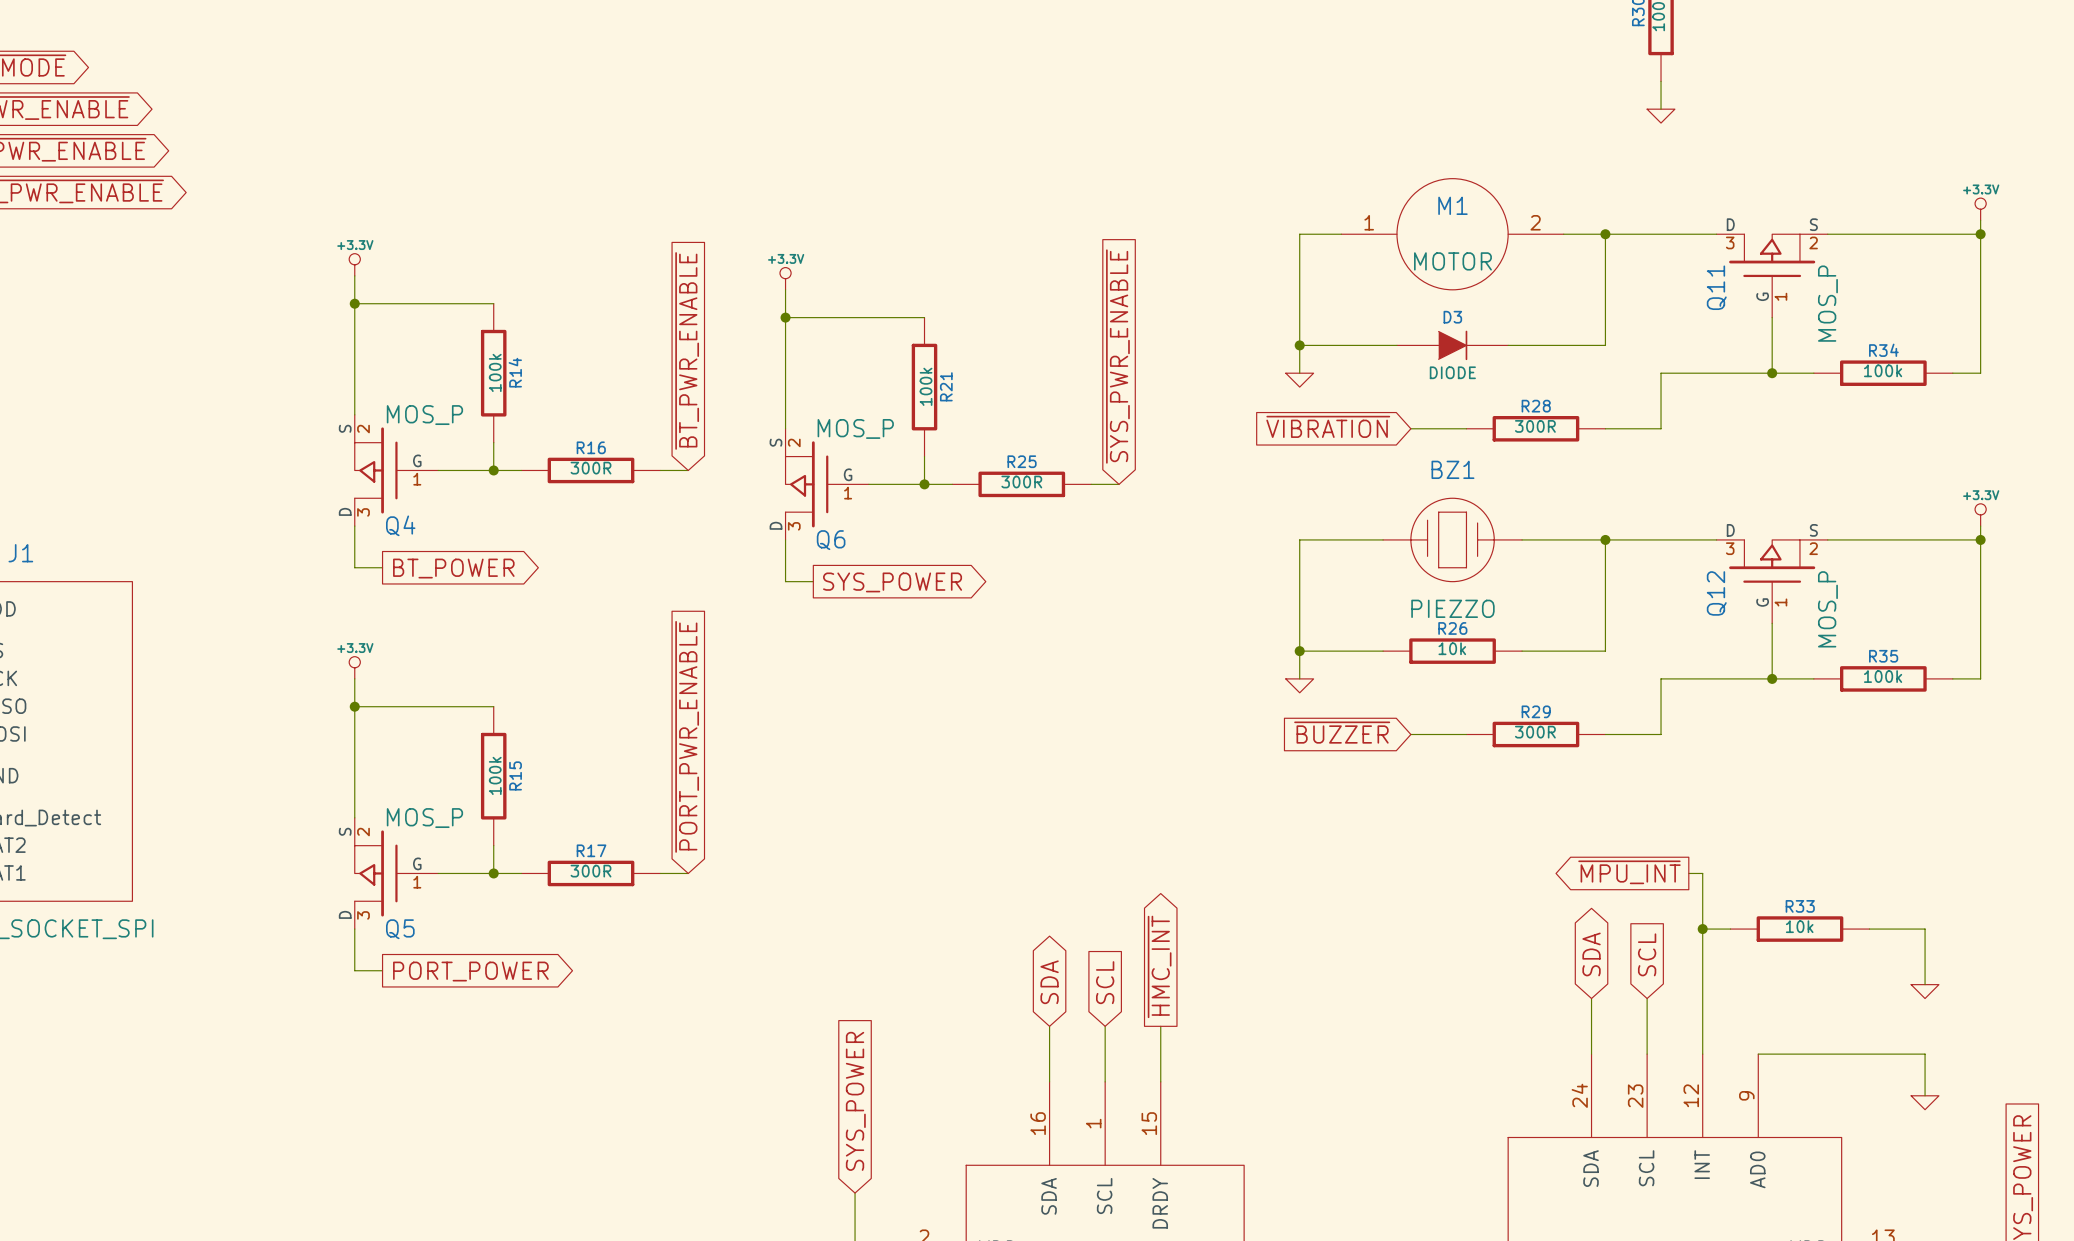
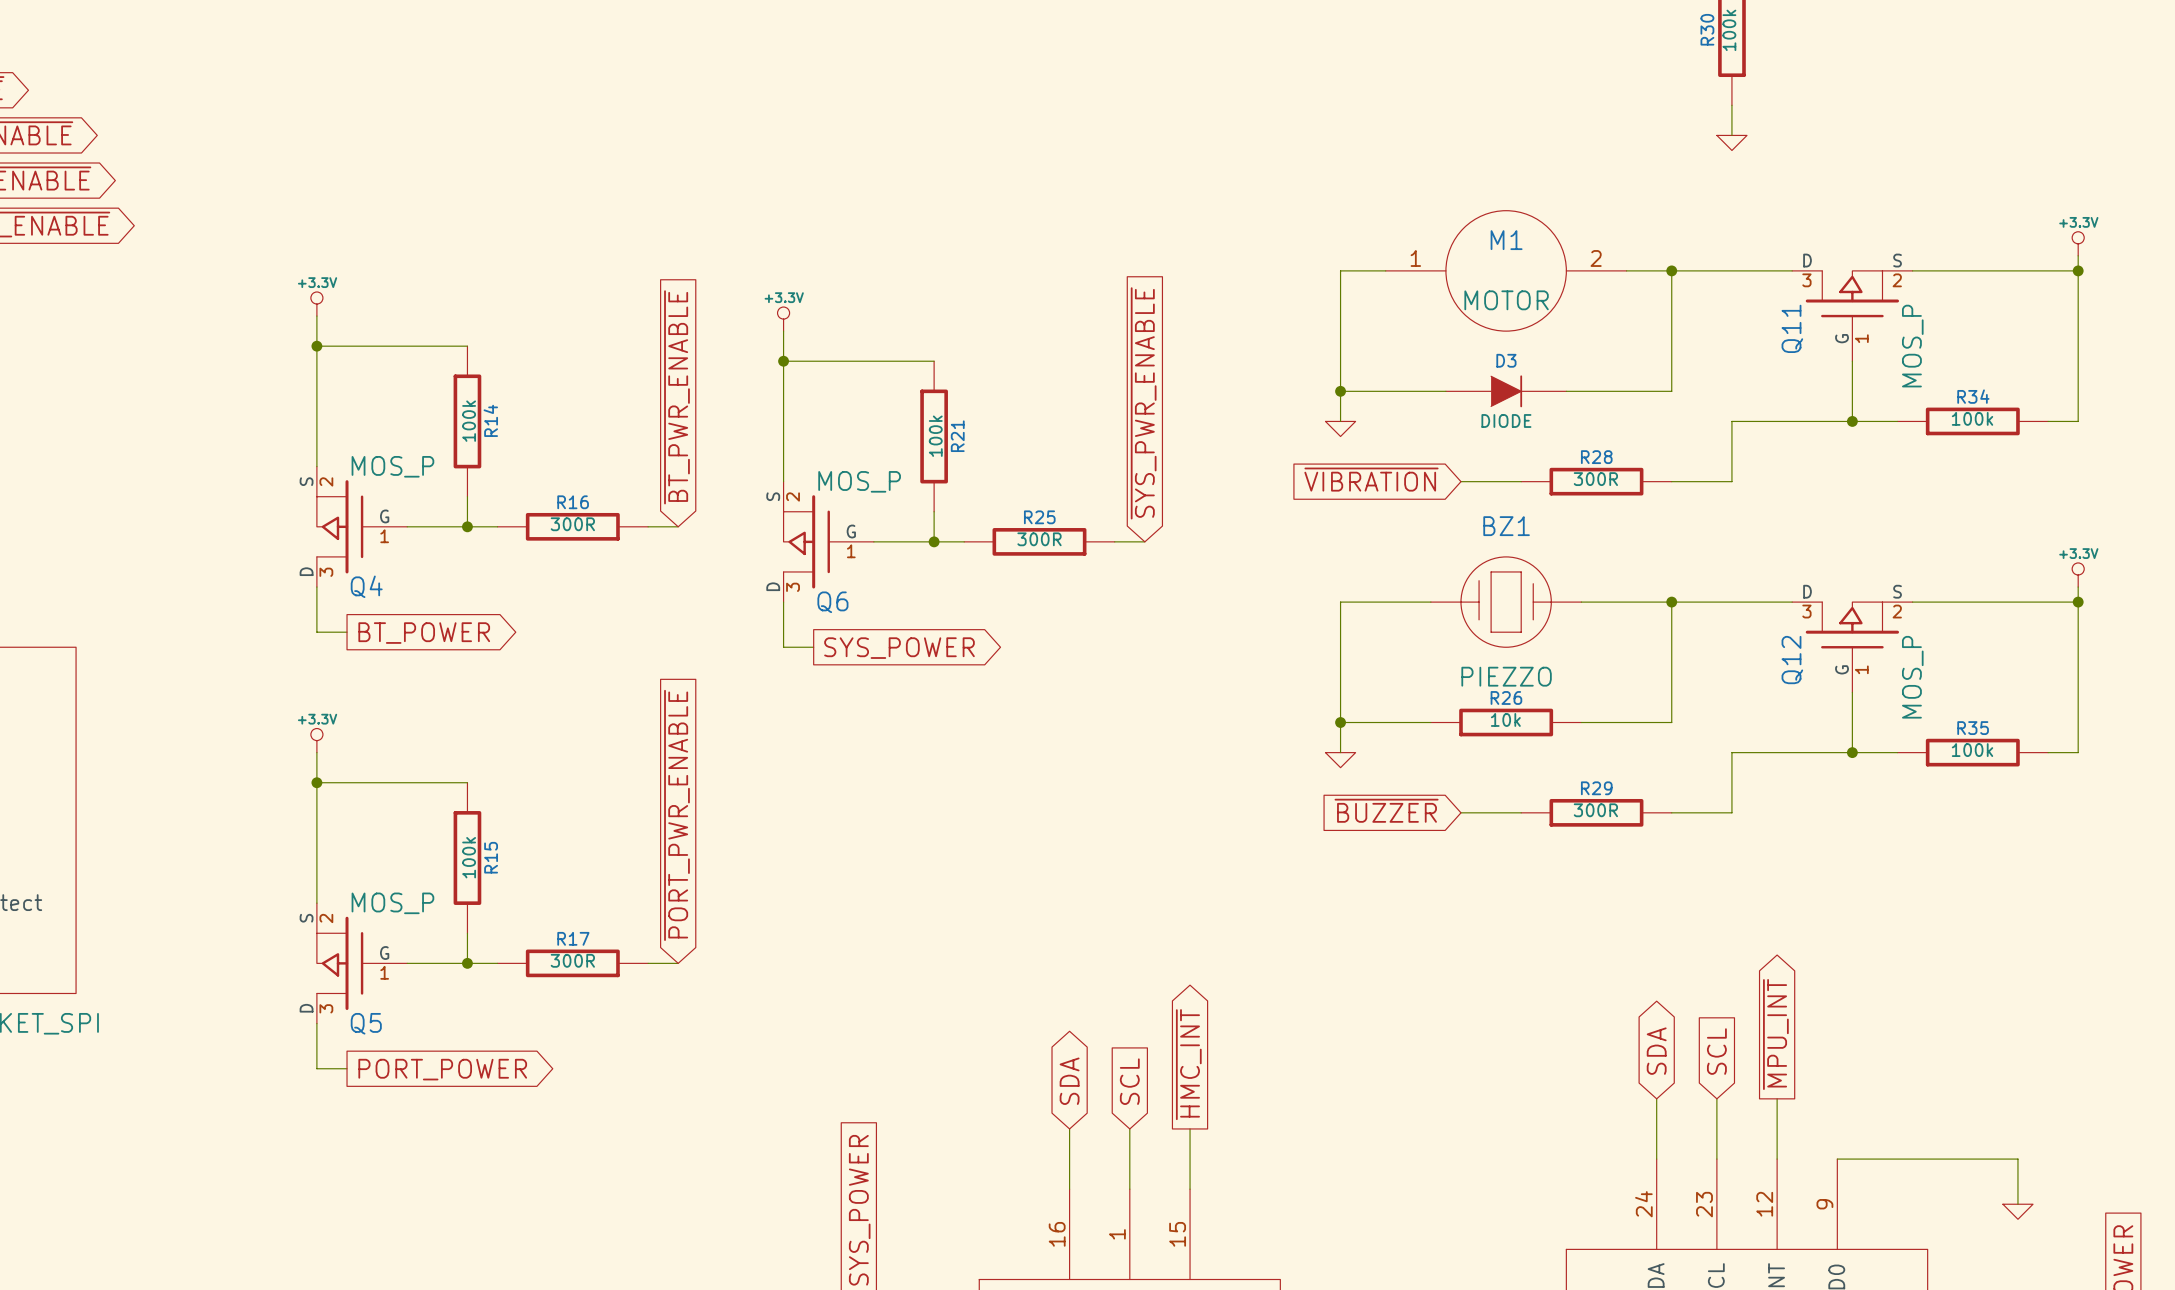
global label rotation: 0° (1629, 872) -> 90° clockwise (1775, 1034)
wire: (1688, 873) (1702, 873) (1702, 998) -> none
wire: (1702, 929) (1730, 929) -> none
junction: (1702, 929) -> none
R33: 10k (1799, 929) -> none
wire: (1869, 929) (1925, 929) (1925, 984) -> none
power symbol: (1925, 991) -> none

